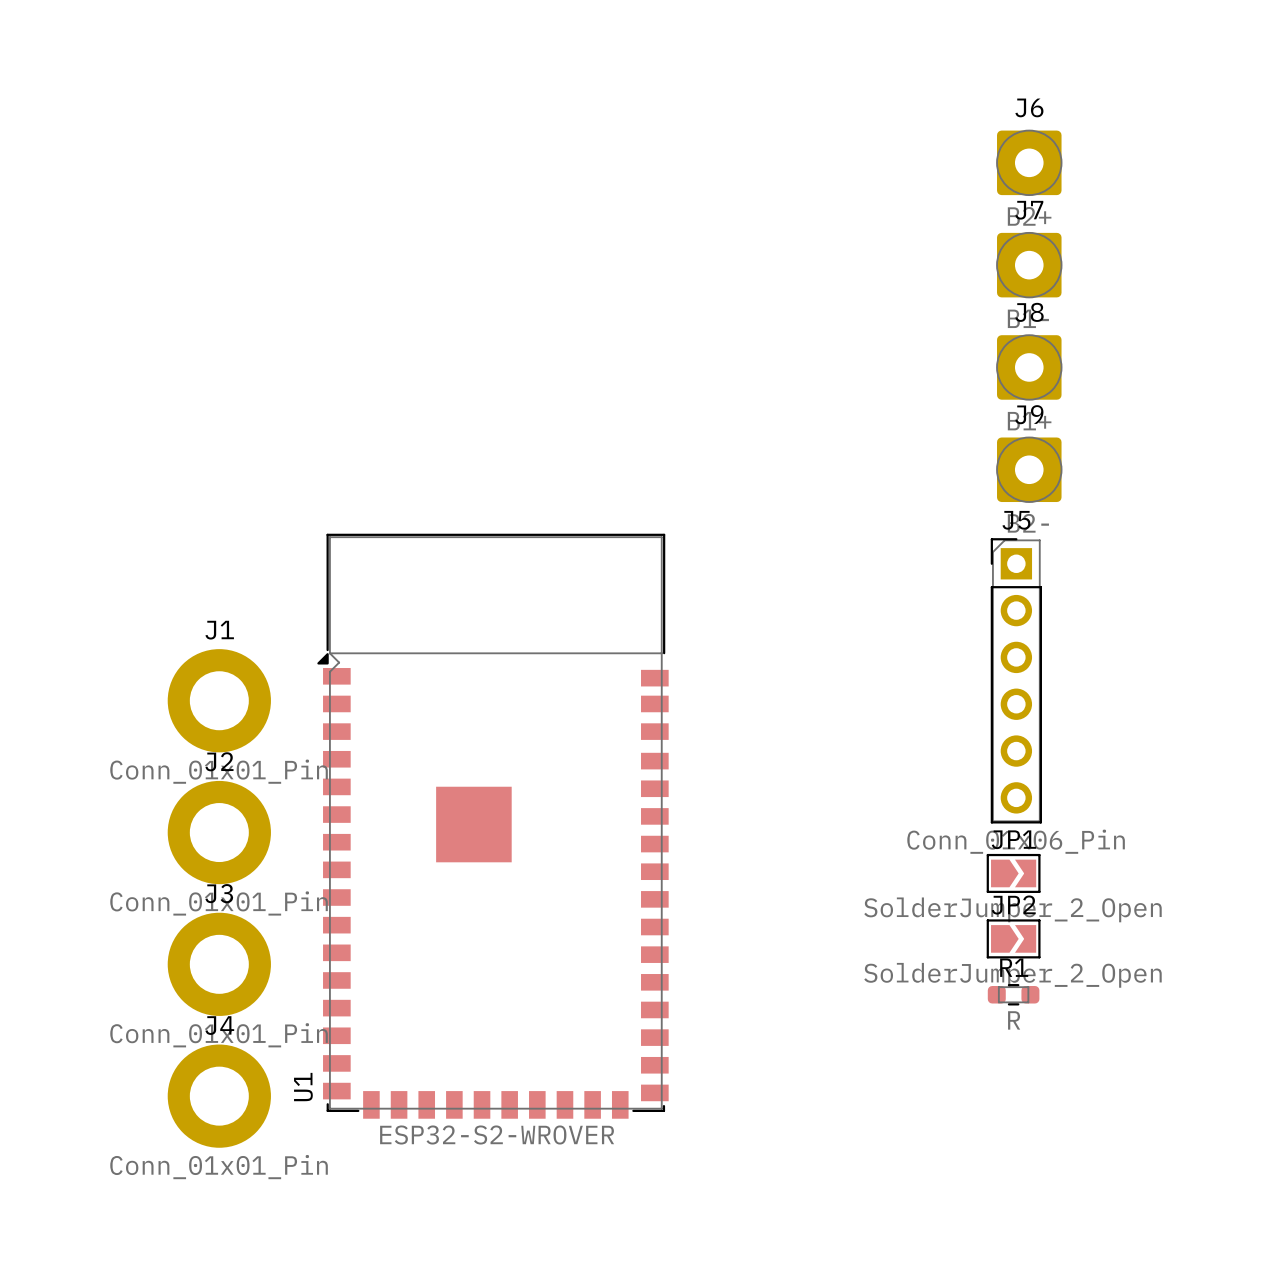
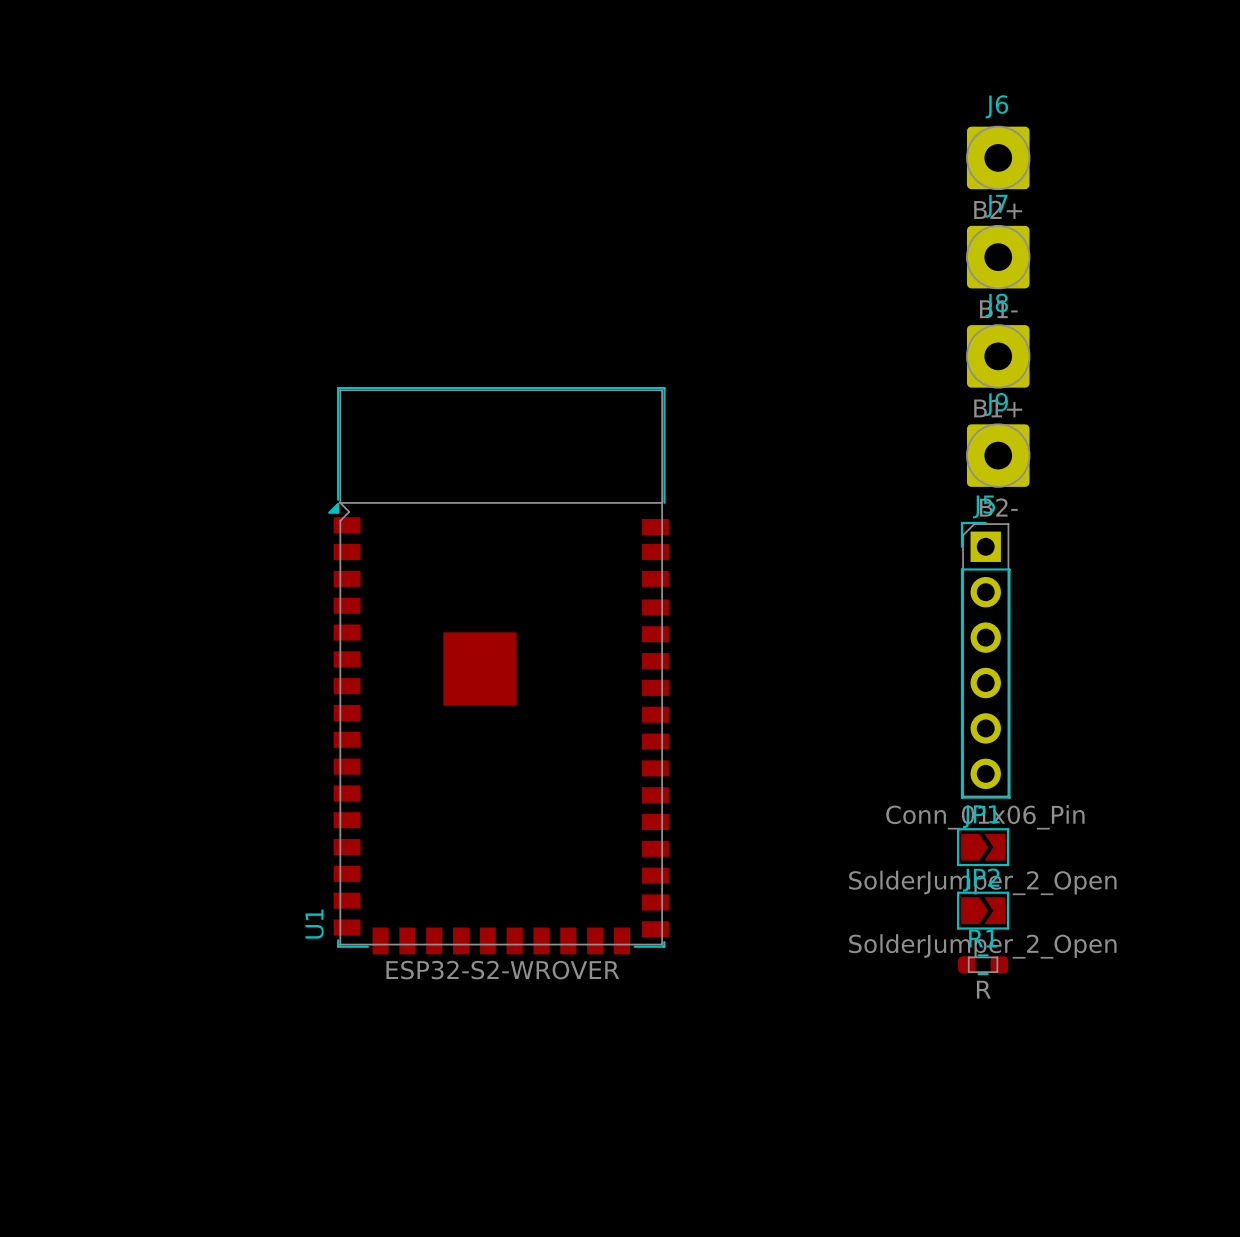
J1: Conn_01x01_Pin (219, 700) -> none
U1 position: (492, 826) -> (498, 670)
J2: Conn_01x01_Pin (219, 832) -> none
J3: Conn_01x01_Pin (219, 964) -> none
J4: Conn_01x01_Pin (219, 1096) -> none

